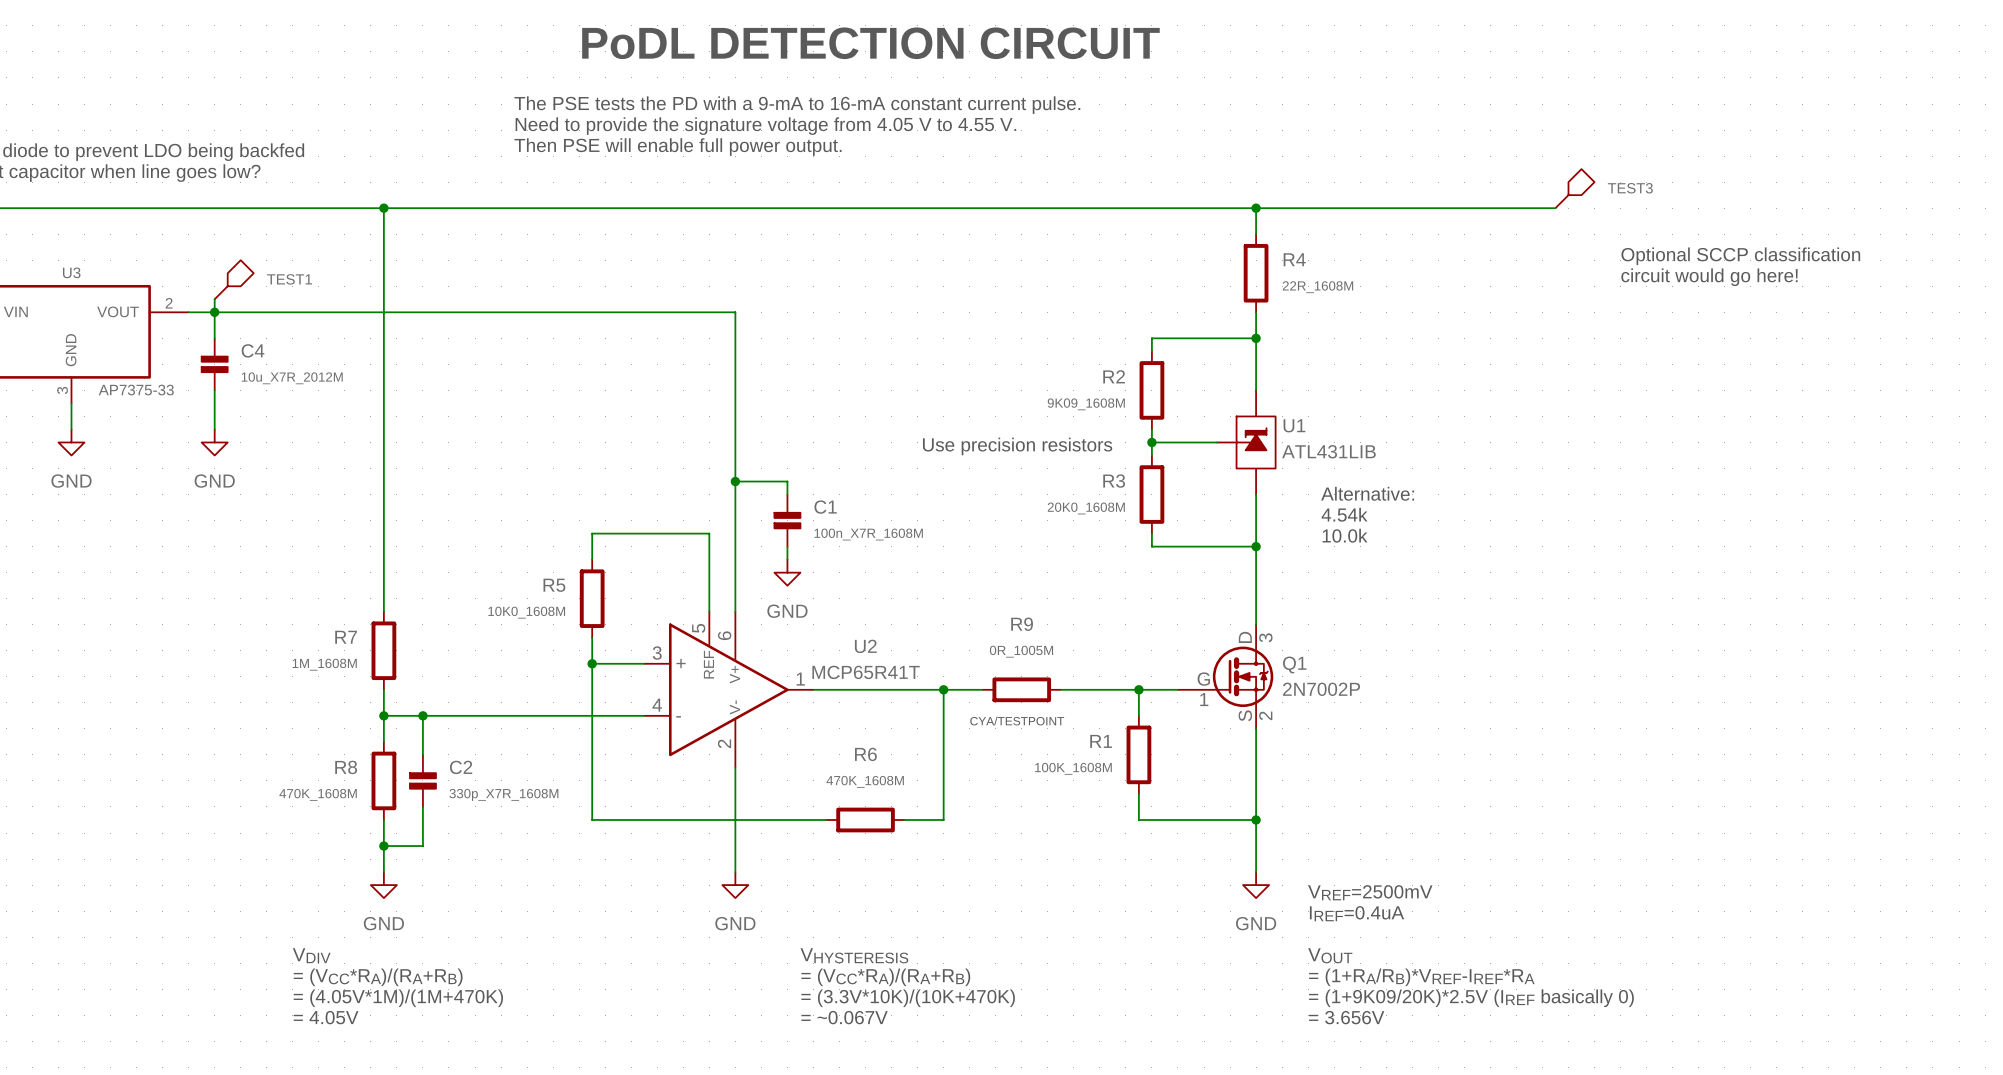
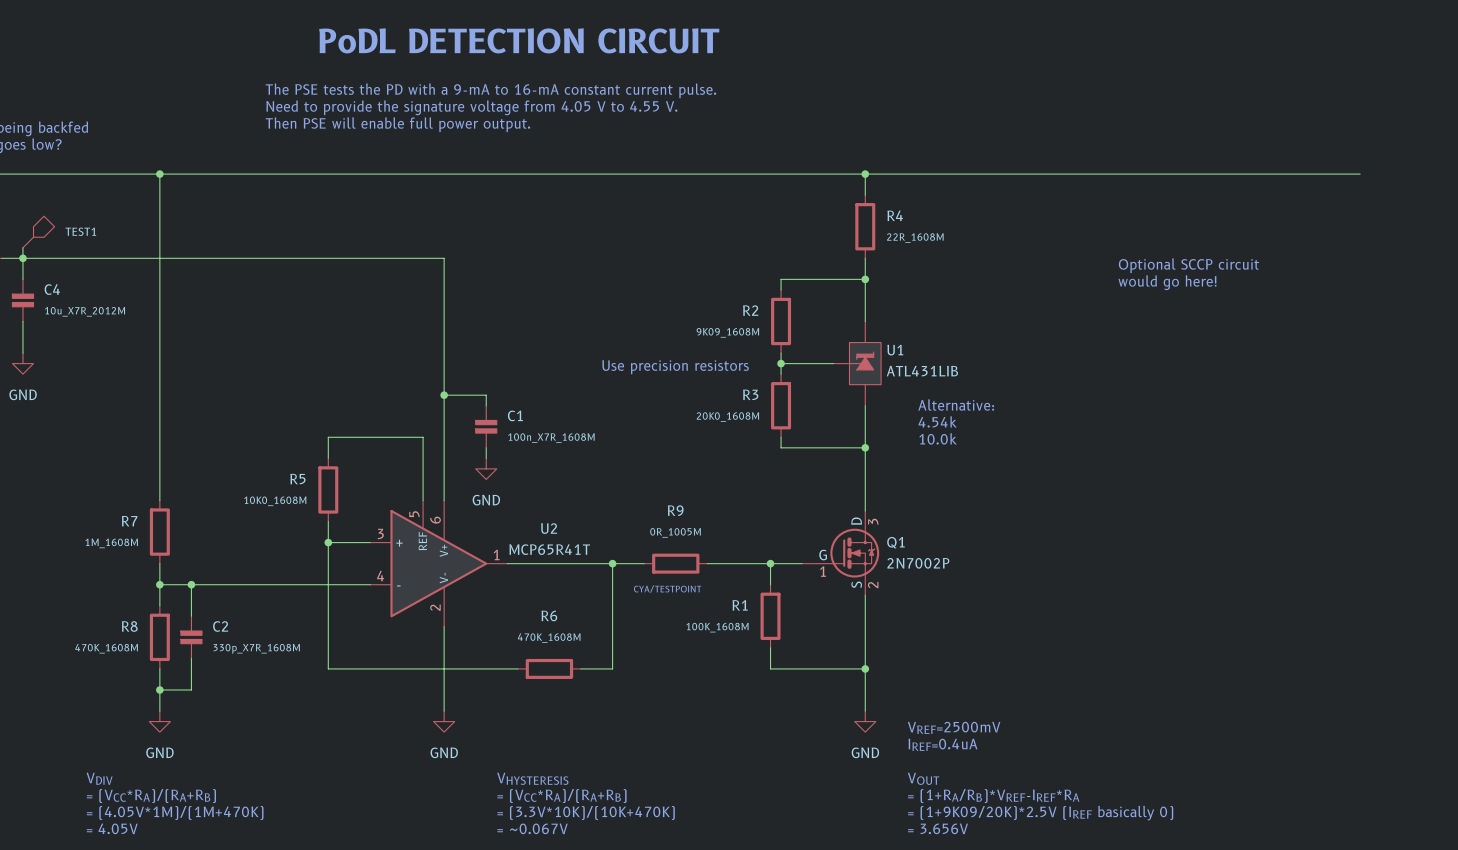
TEST3: (1575, 188) -> none
wire: none -> (1107, 174) (1360, 174)
text: Optional SCCP classification (1740, 256) -> none
text: circuit would go here! (1709, 277) -> none
text: none -> Optional SCCP circuit (1188, 265)
text: none -> would go here! (1167, 282)

